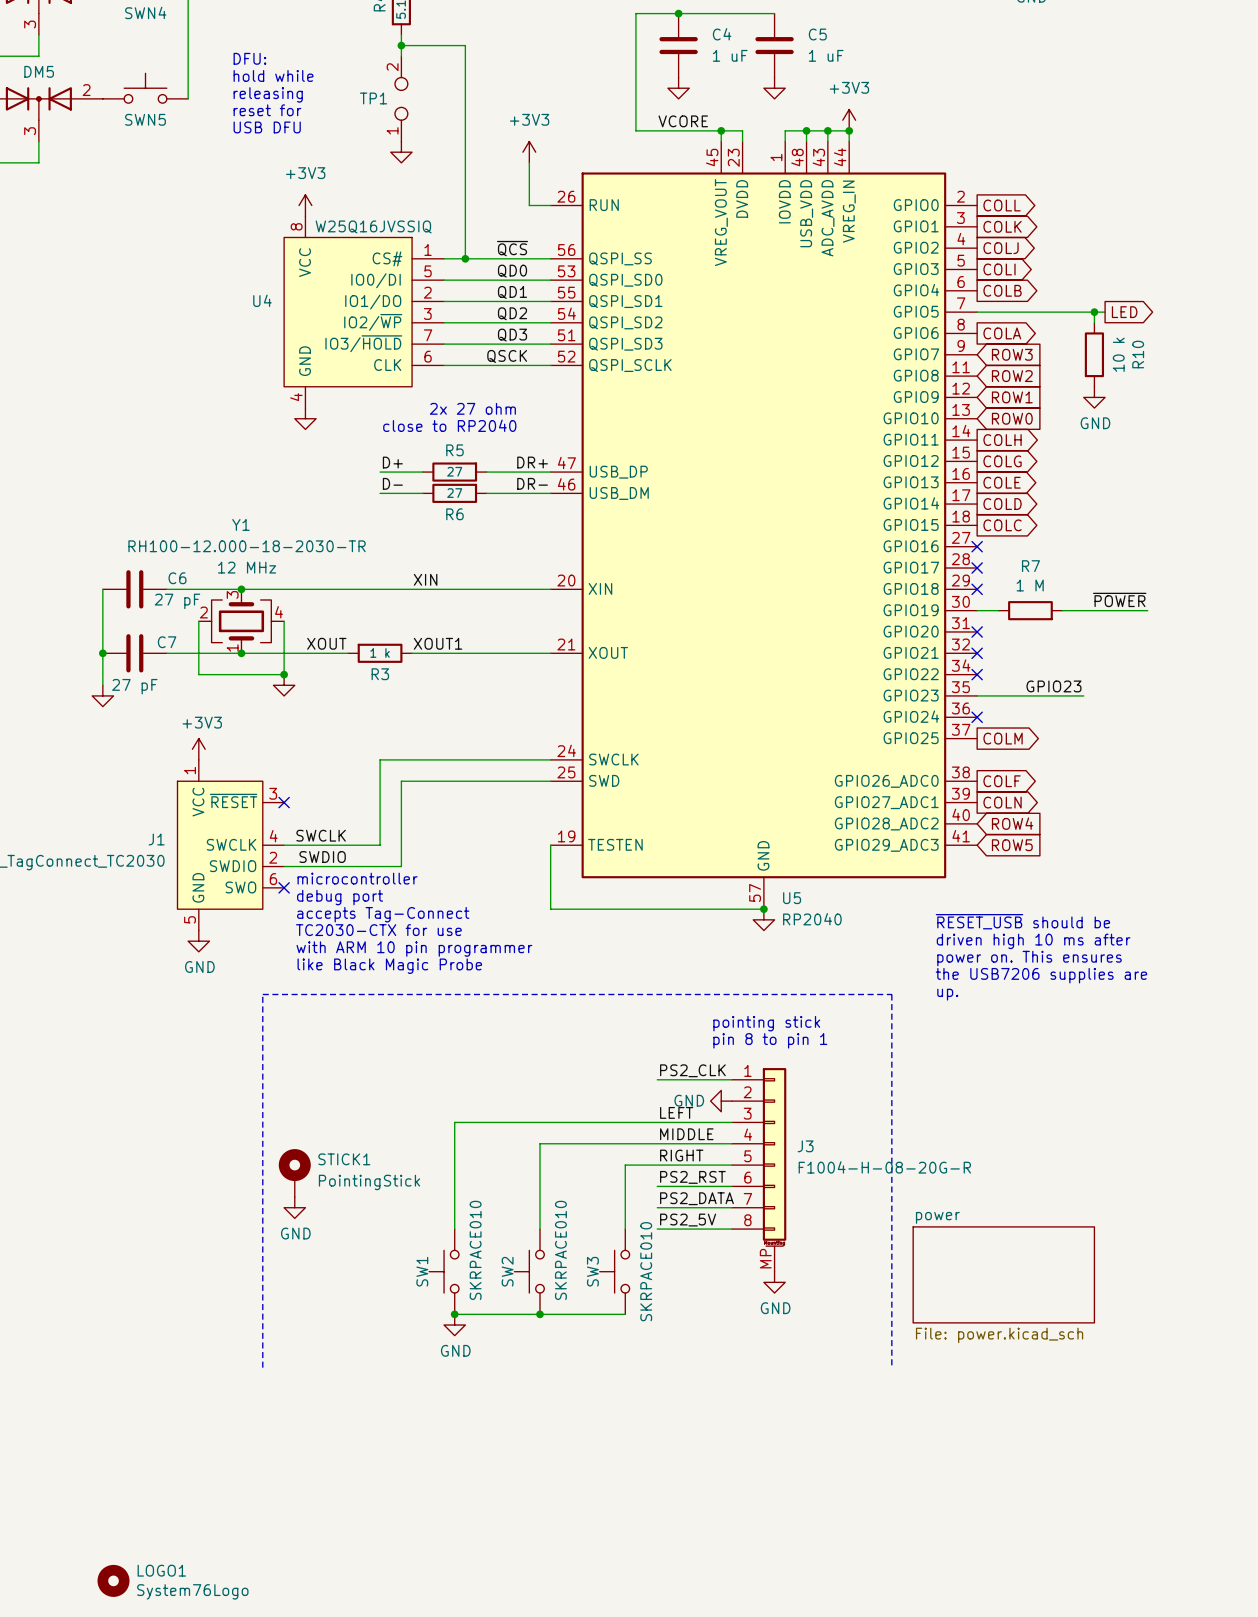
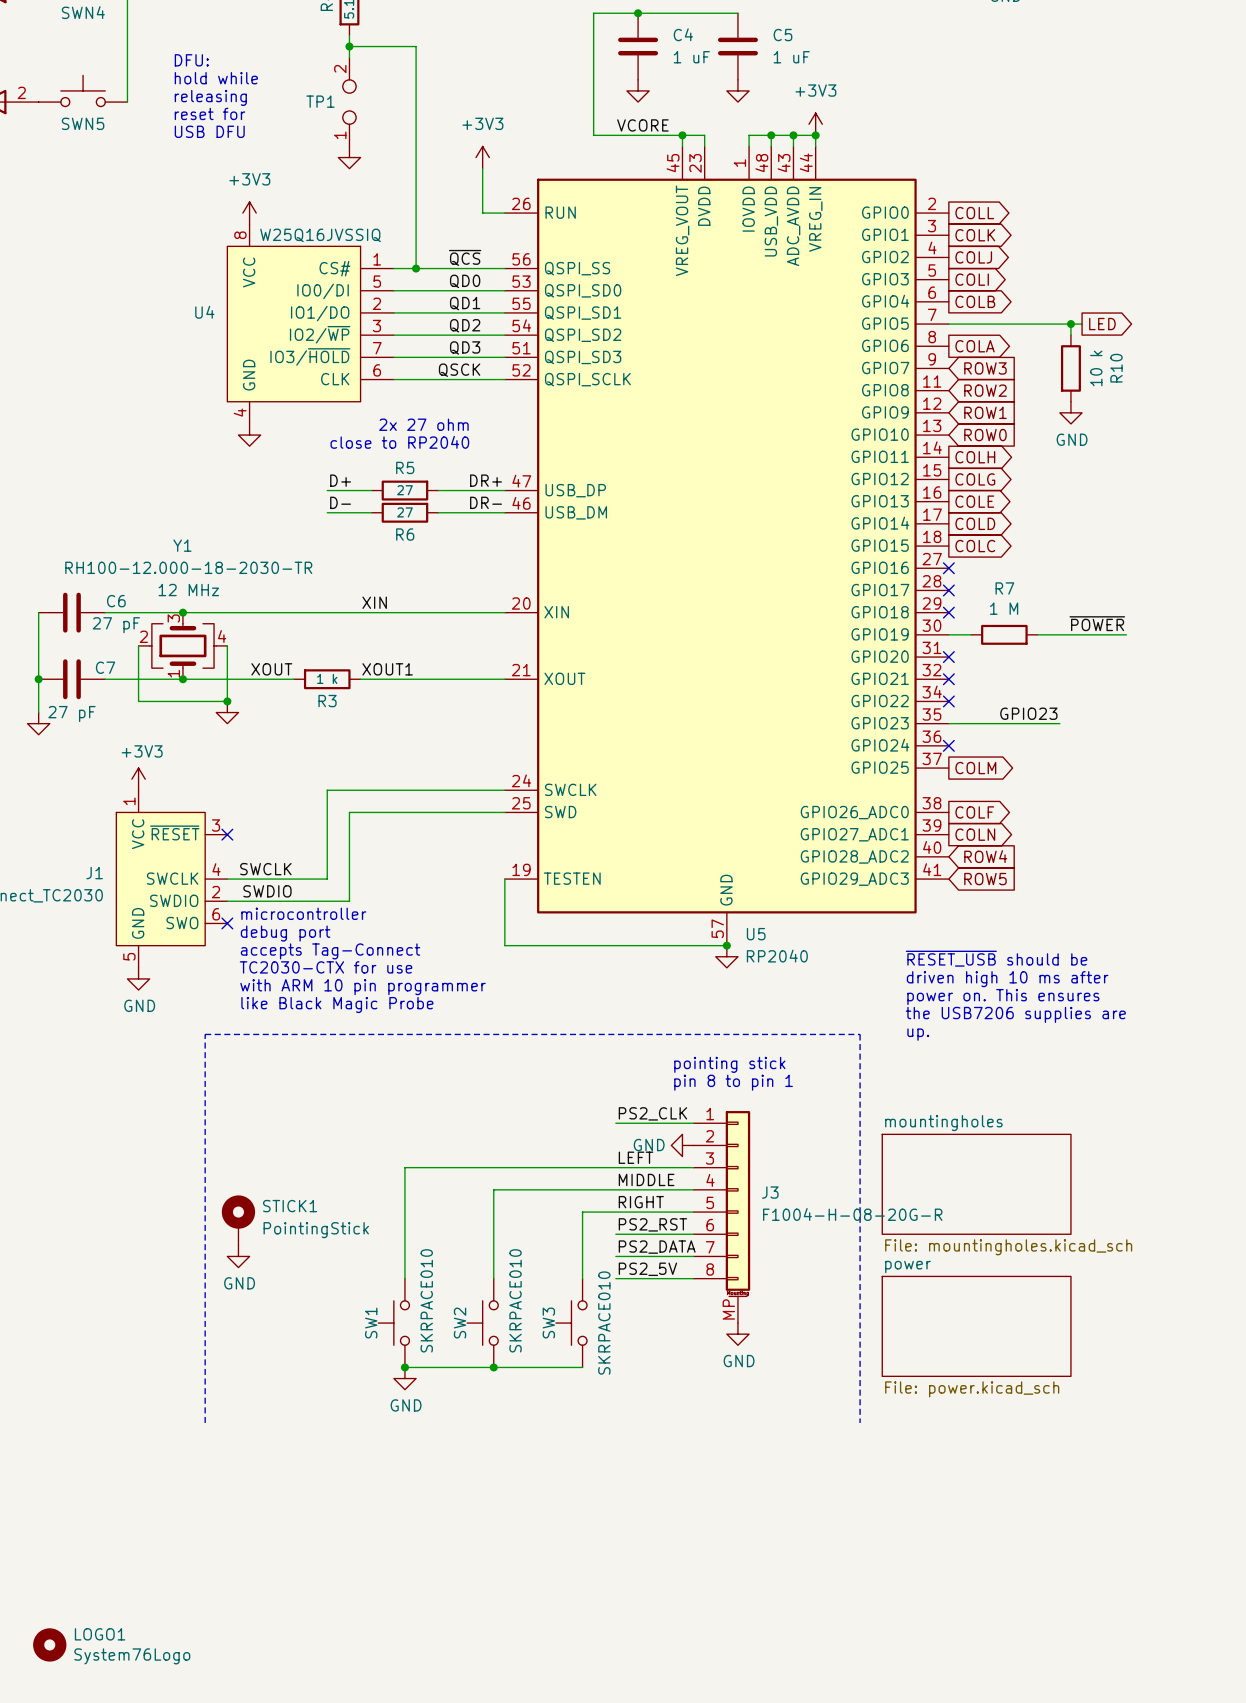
sheet mountingholes: none -> File: mountingholes.kicad_sch (976, 1184)

